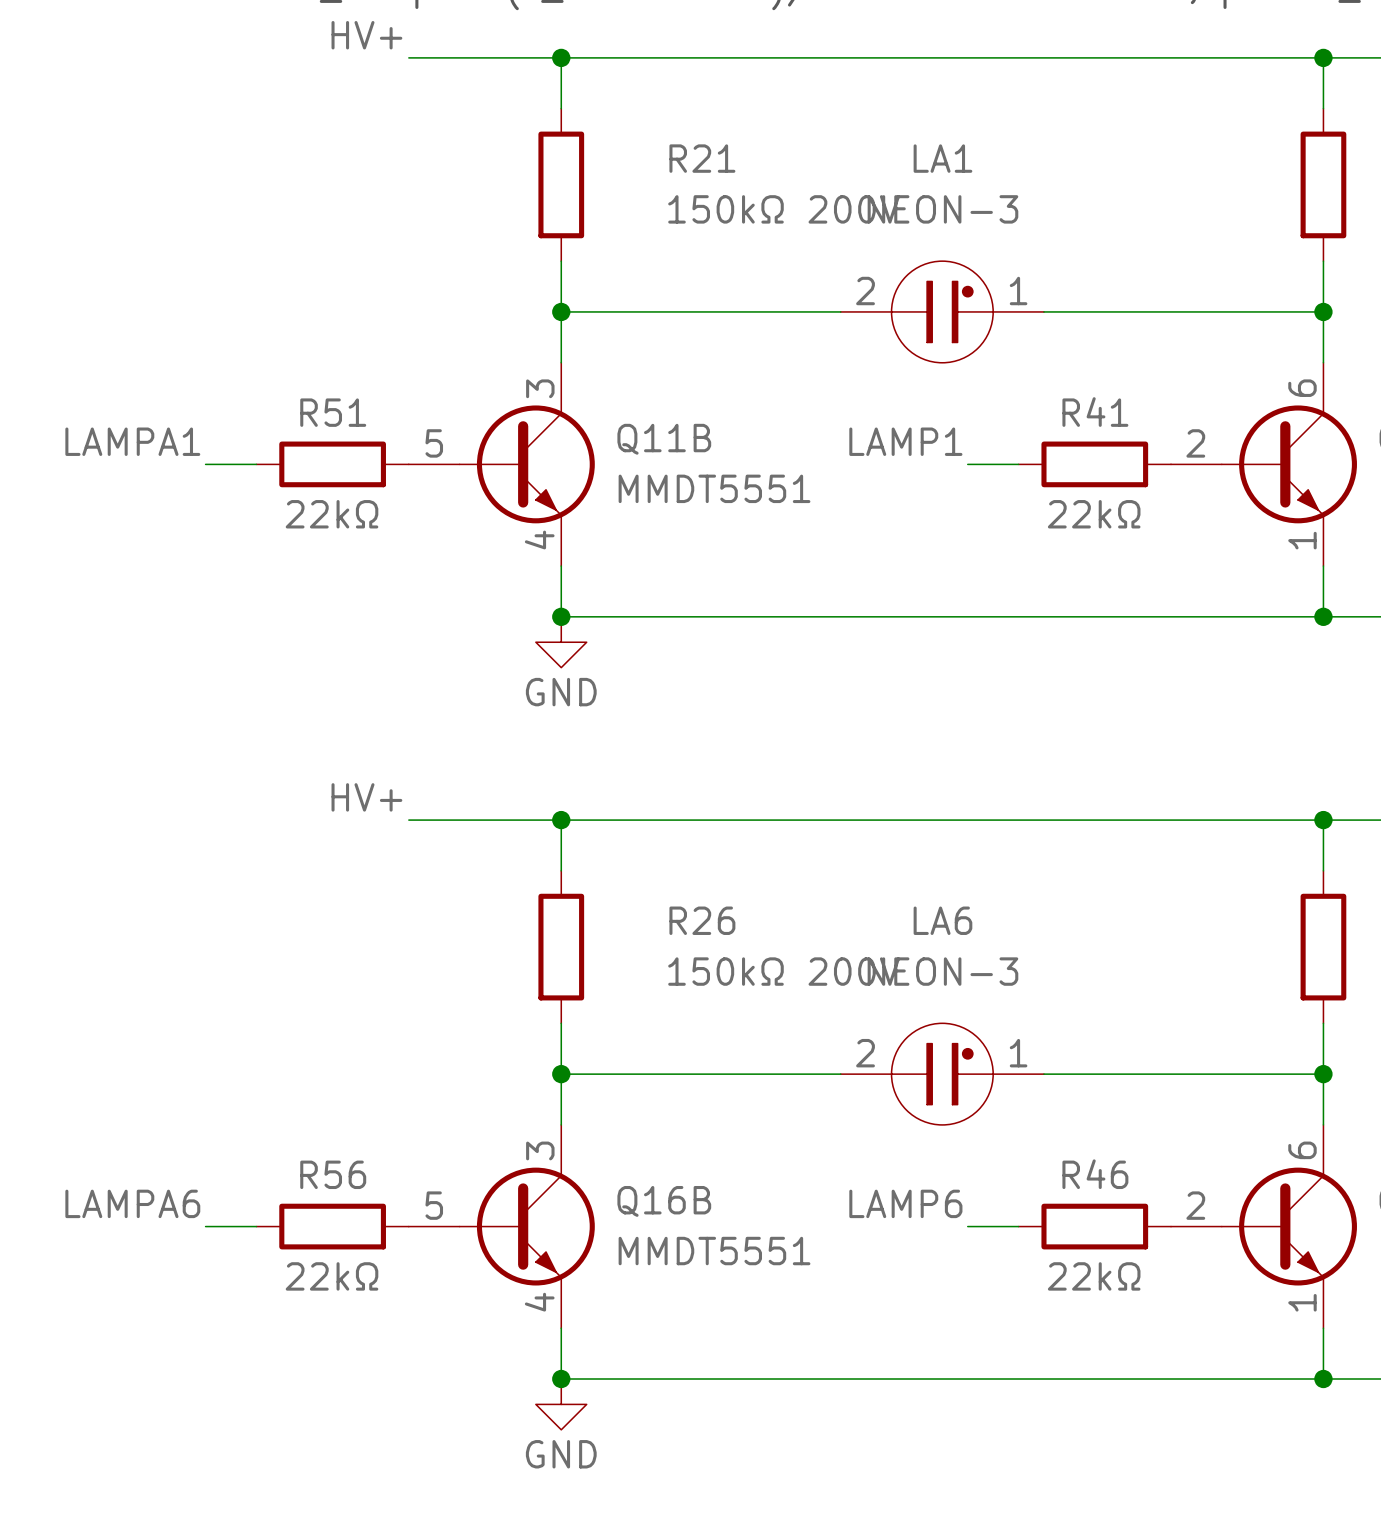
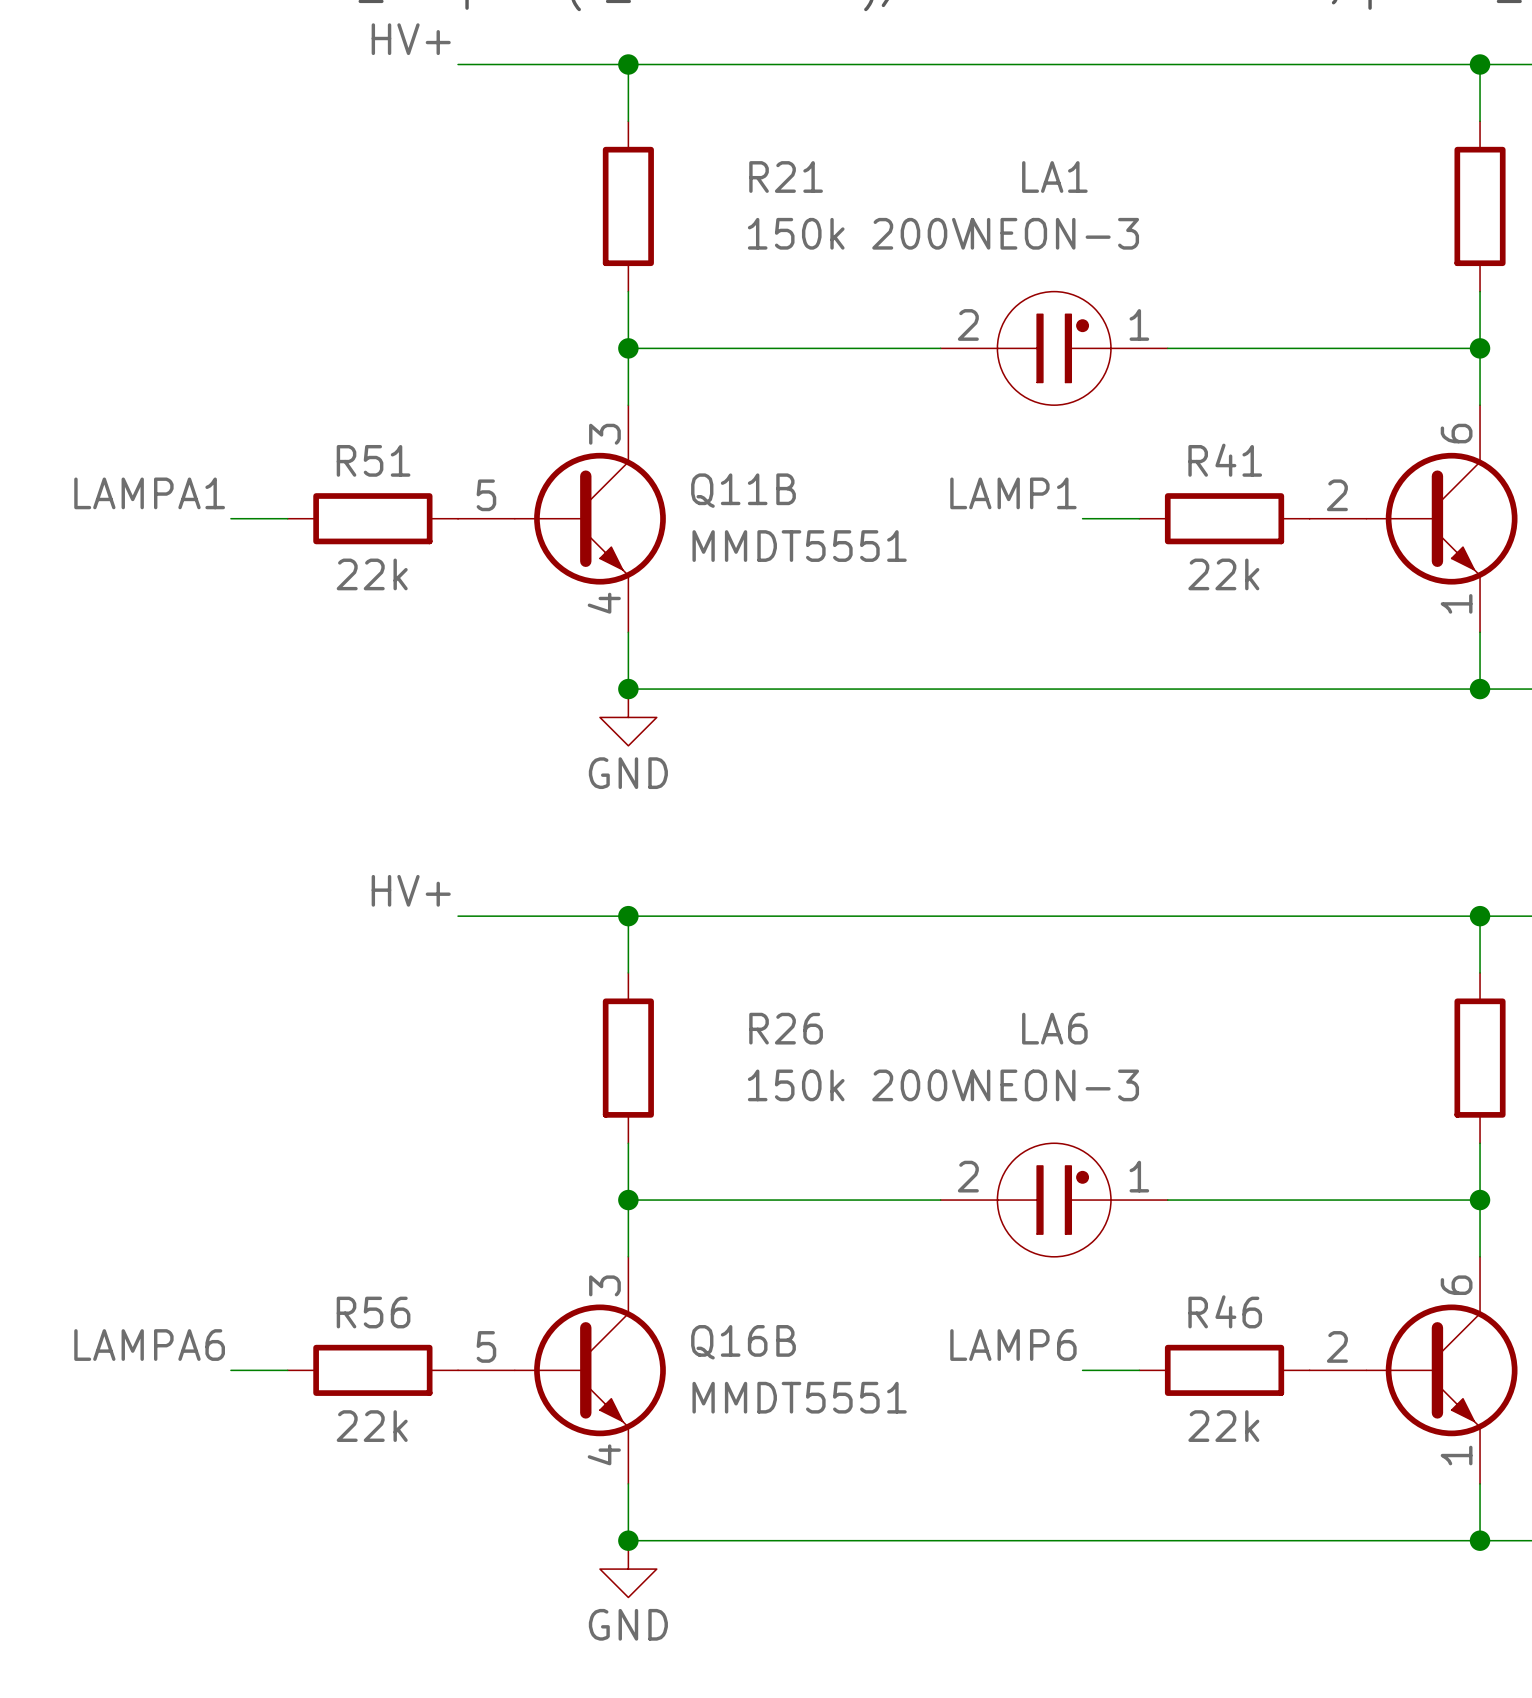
R21 value: 150kΩ 200V (784, 209) -> 150k 200V (861, 233)
R51 value: 22kΩ (332, 514) -> 22k (372, 574)
R41 value: 22kΩ (1094, 514) -> 22k (1223, 574)
R26 value: 150kΩ 200V (784, 971) -> 150k 200V (861, 1085)
R56 value: 22kΩ (332, 1276) -> 22k (372, 1426)
R46 value: 22kΩ (1094, 1276) -> 22k (1223, 1426)

